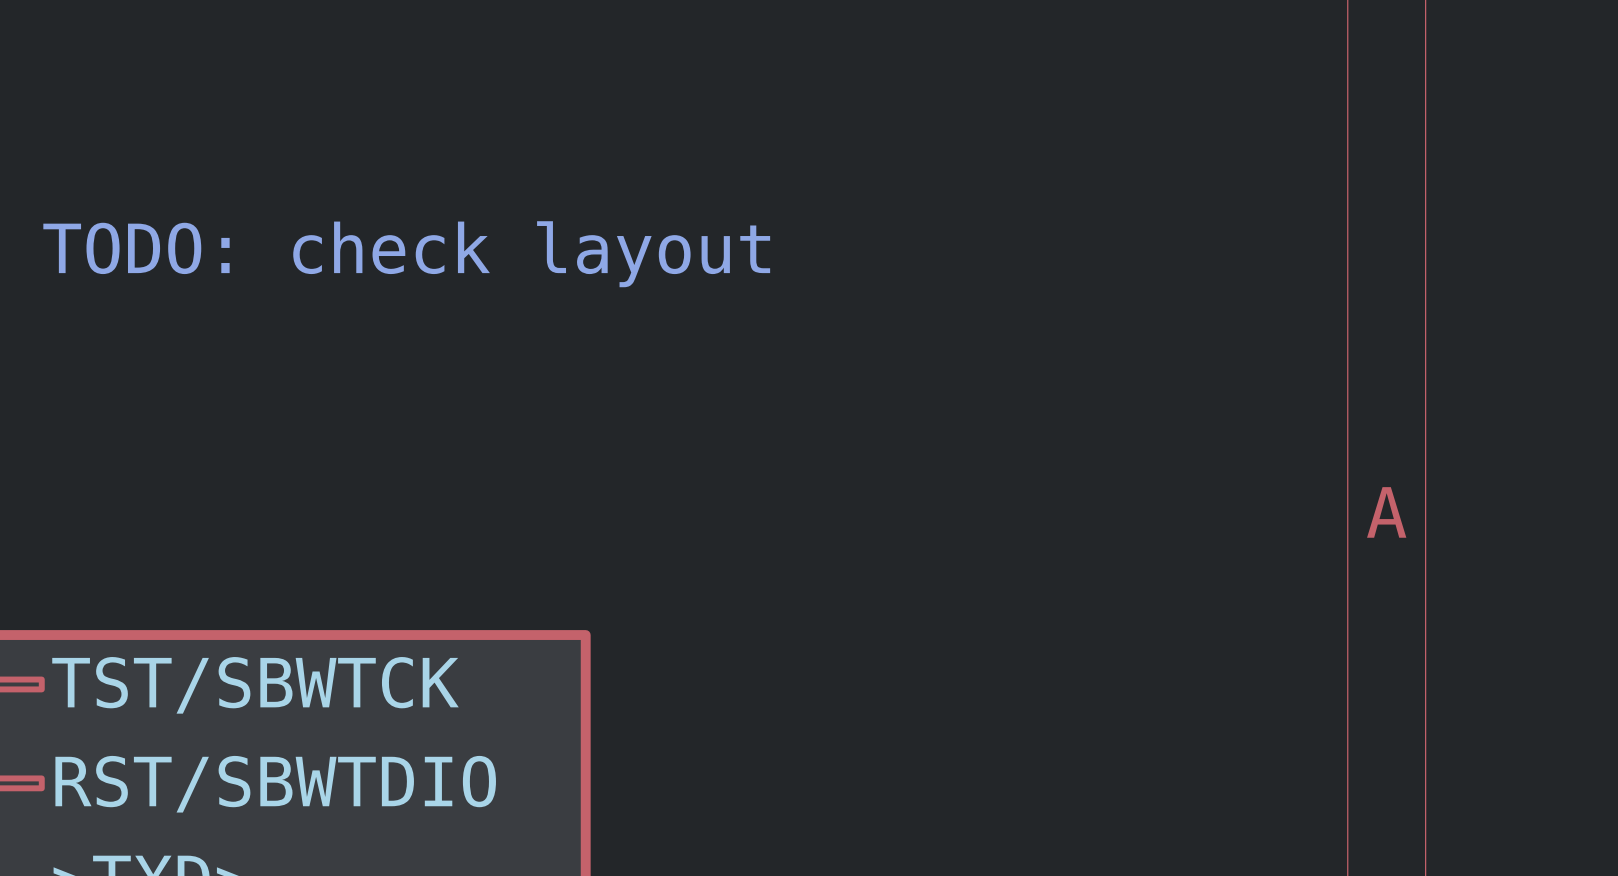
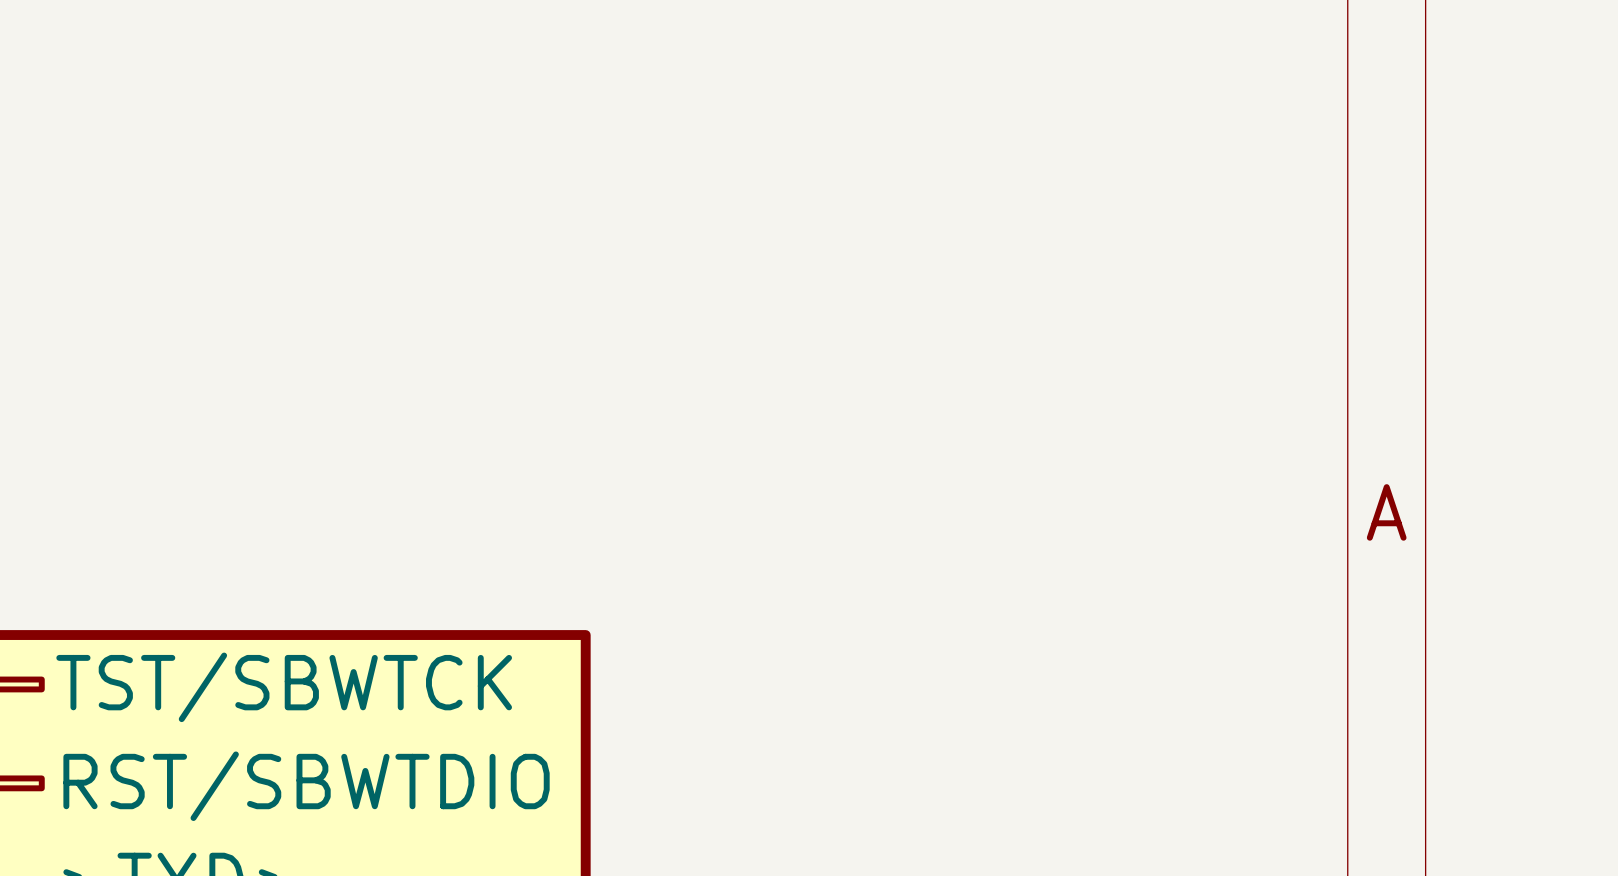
text: TODO: check layout (406, 254) -> none

